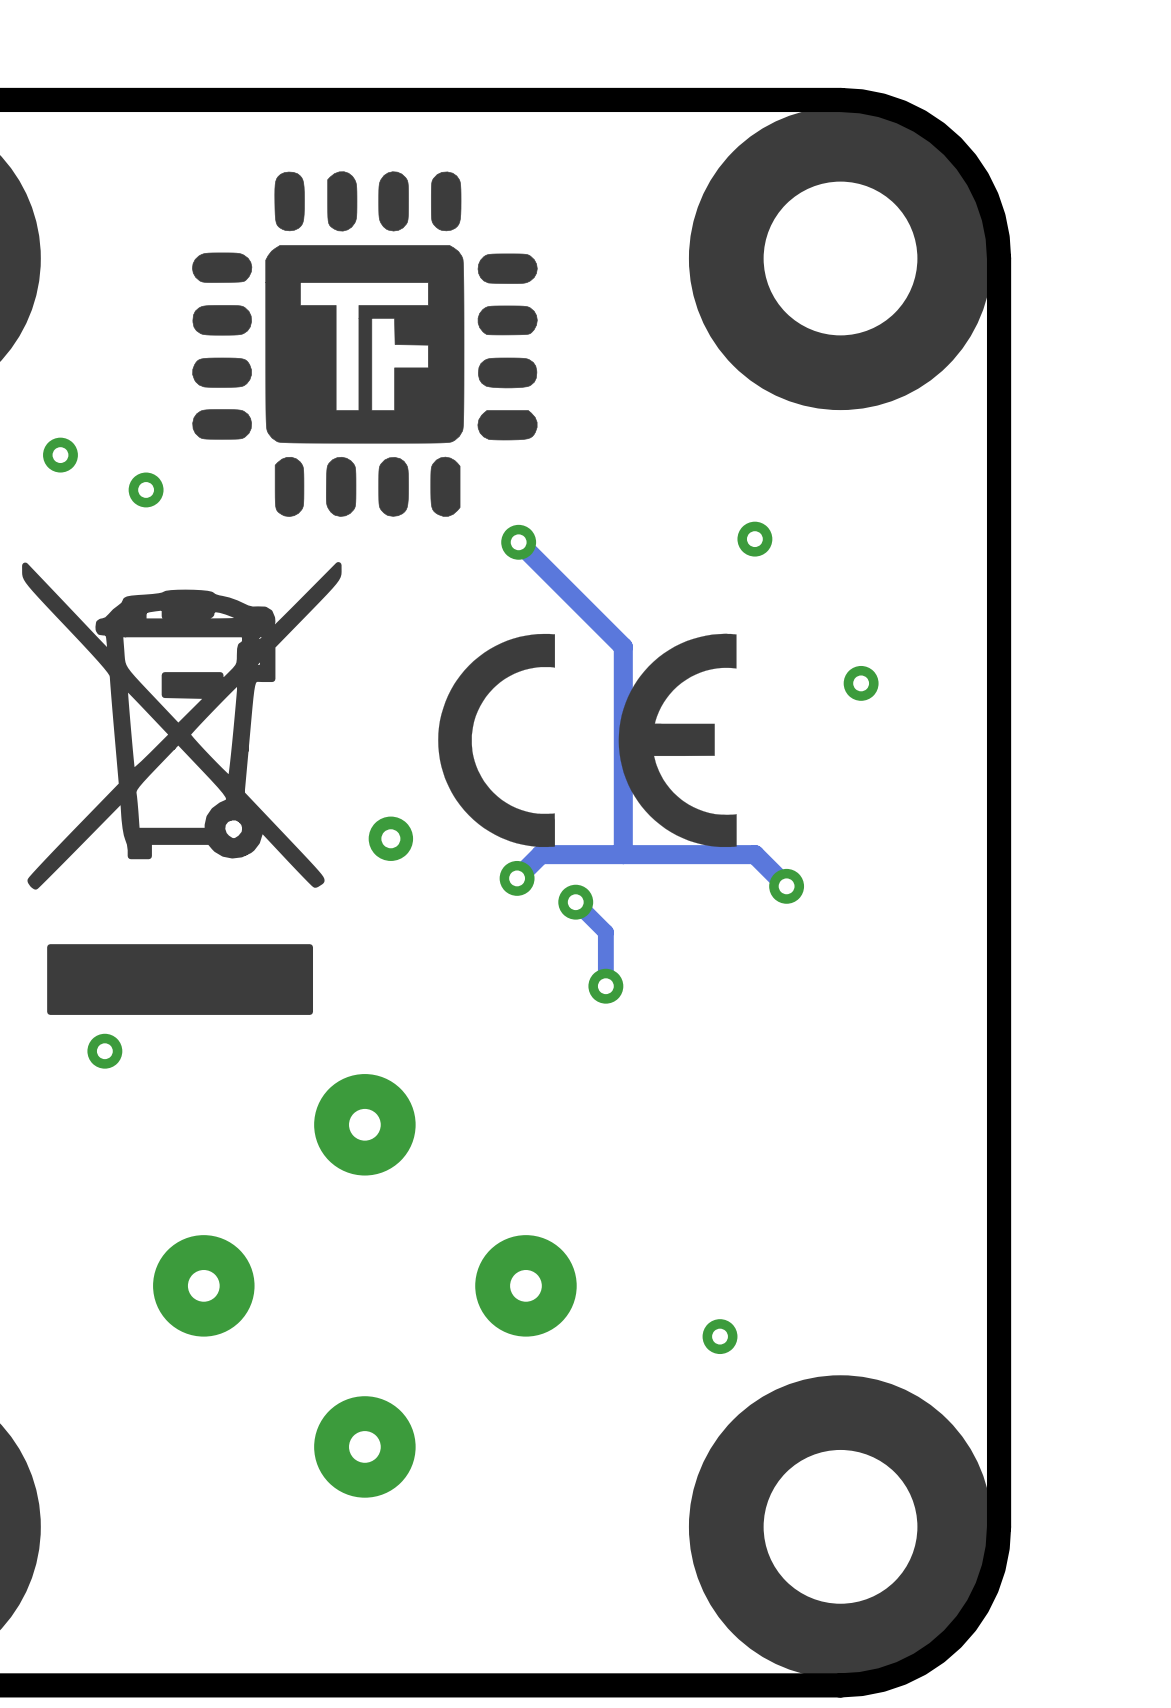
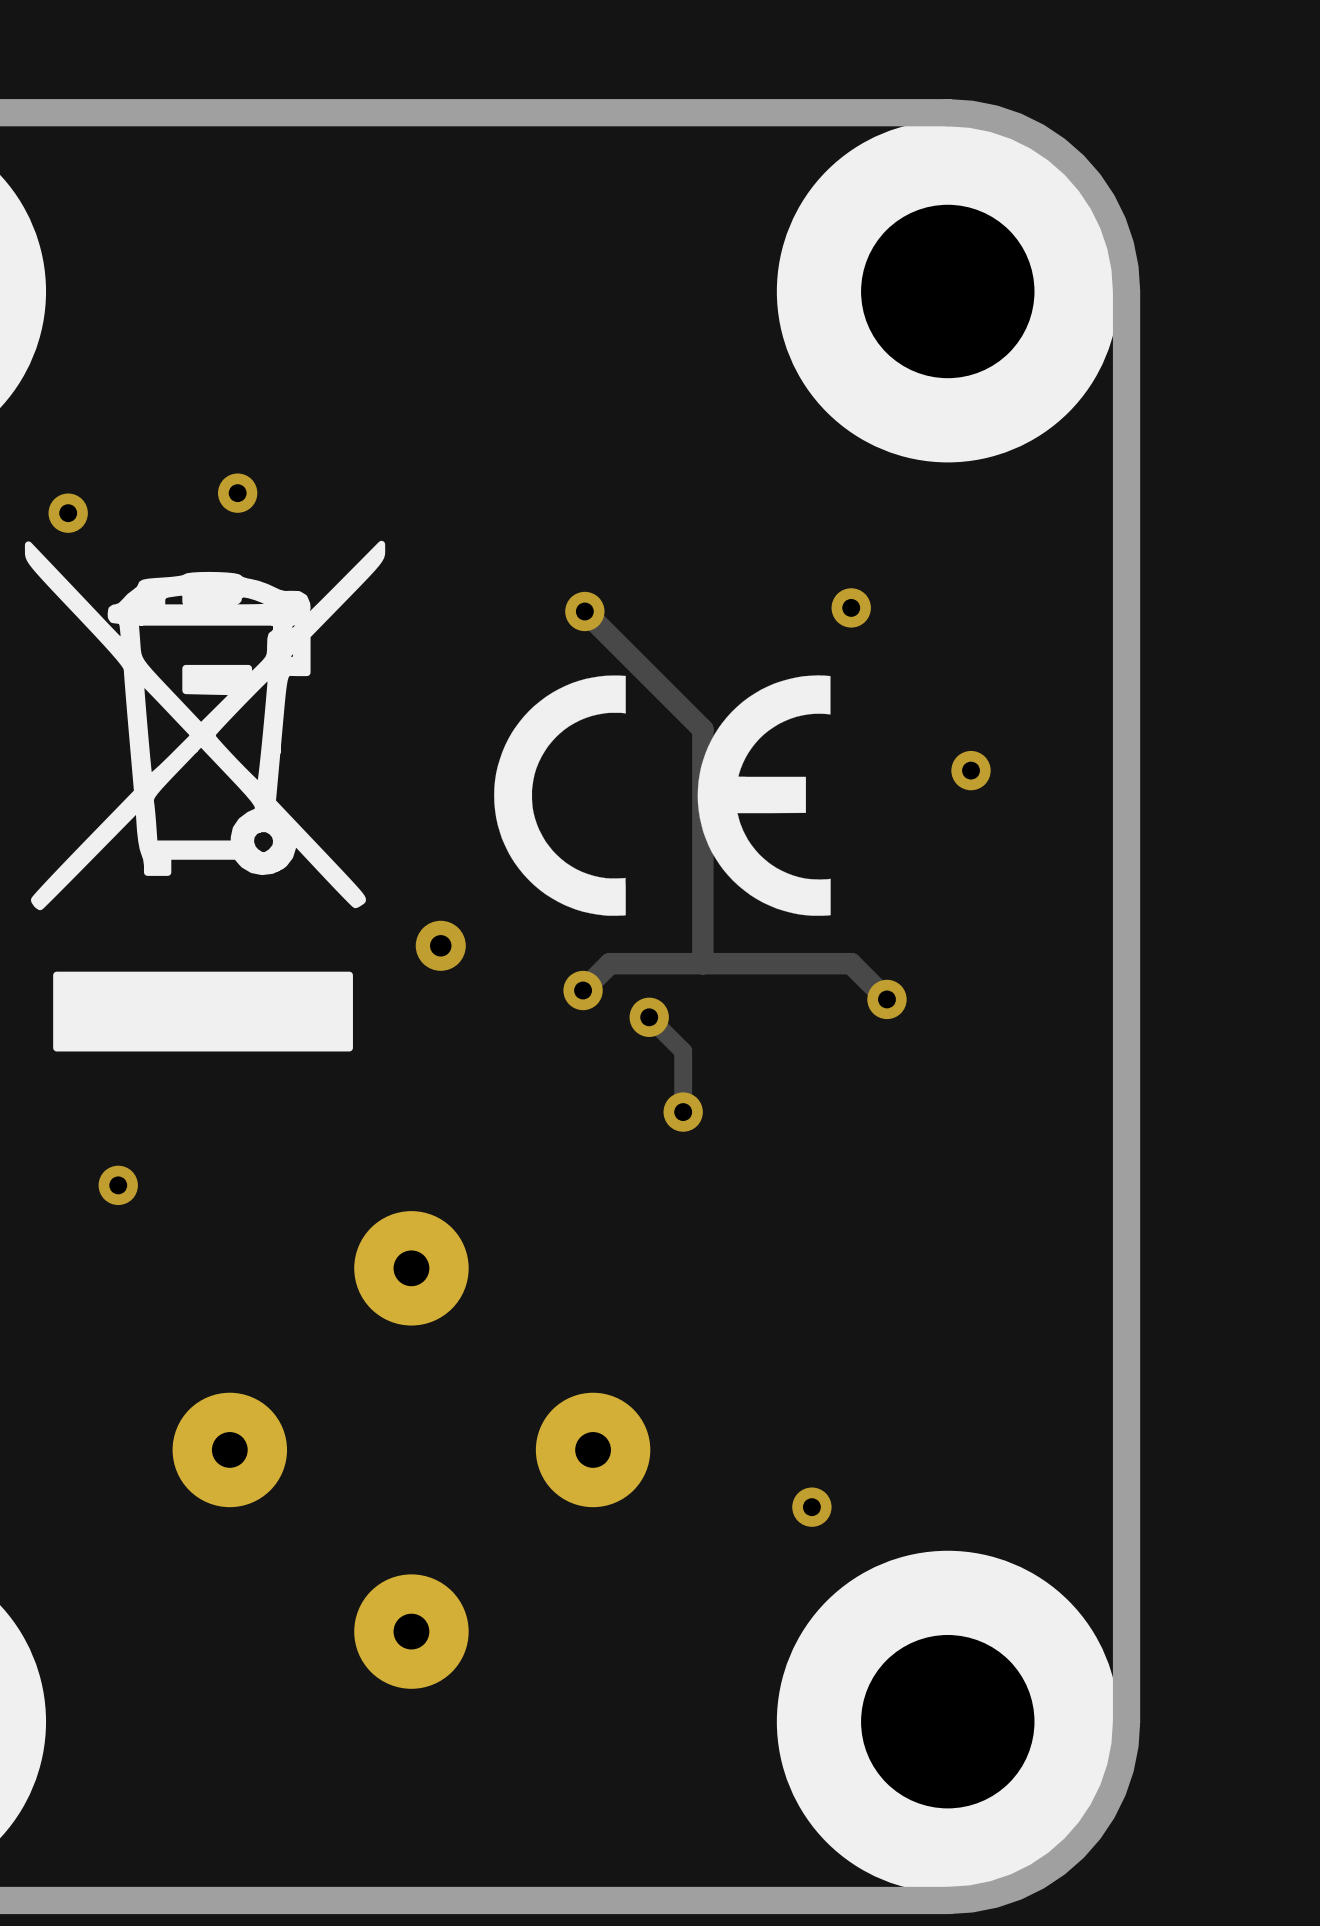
drawing: [192, 171, 538, 517] -> none
via position: (146, 489) -> (237, 493)
drawing position: (587, 740) -> (662, 795)
drawing position: (181, 788) -> (205, 796)

